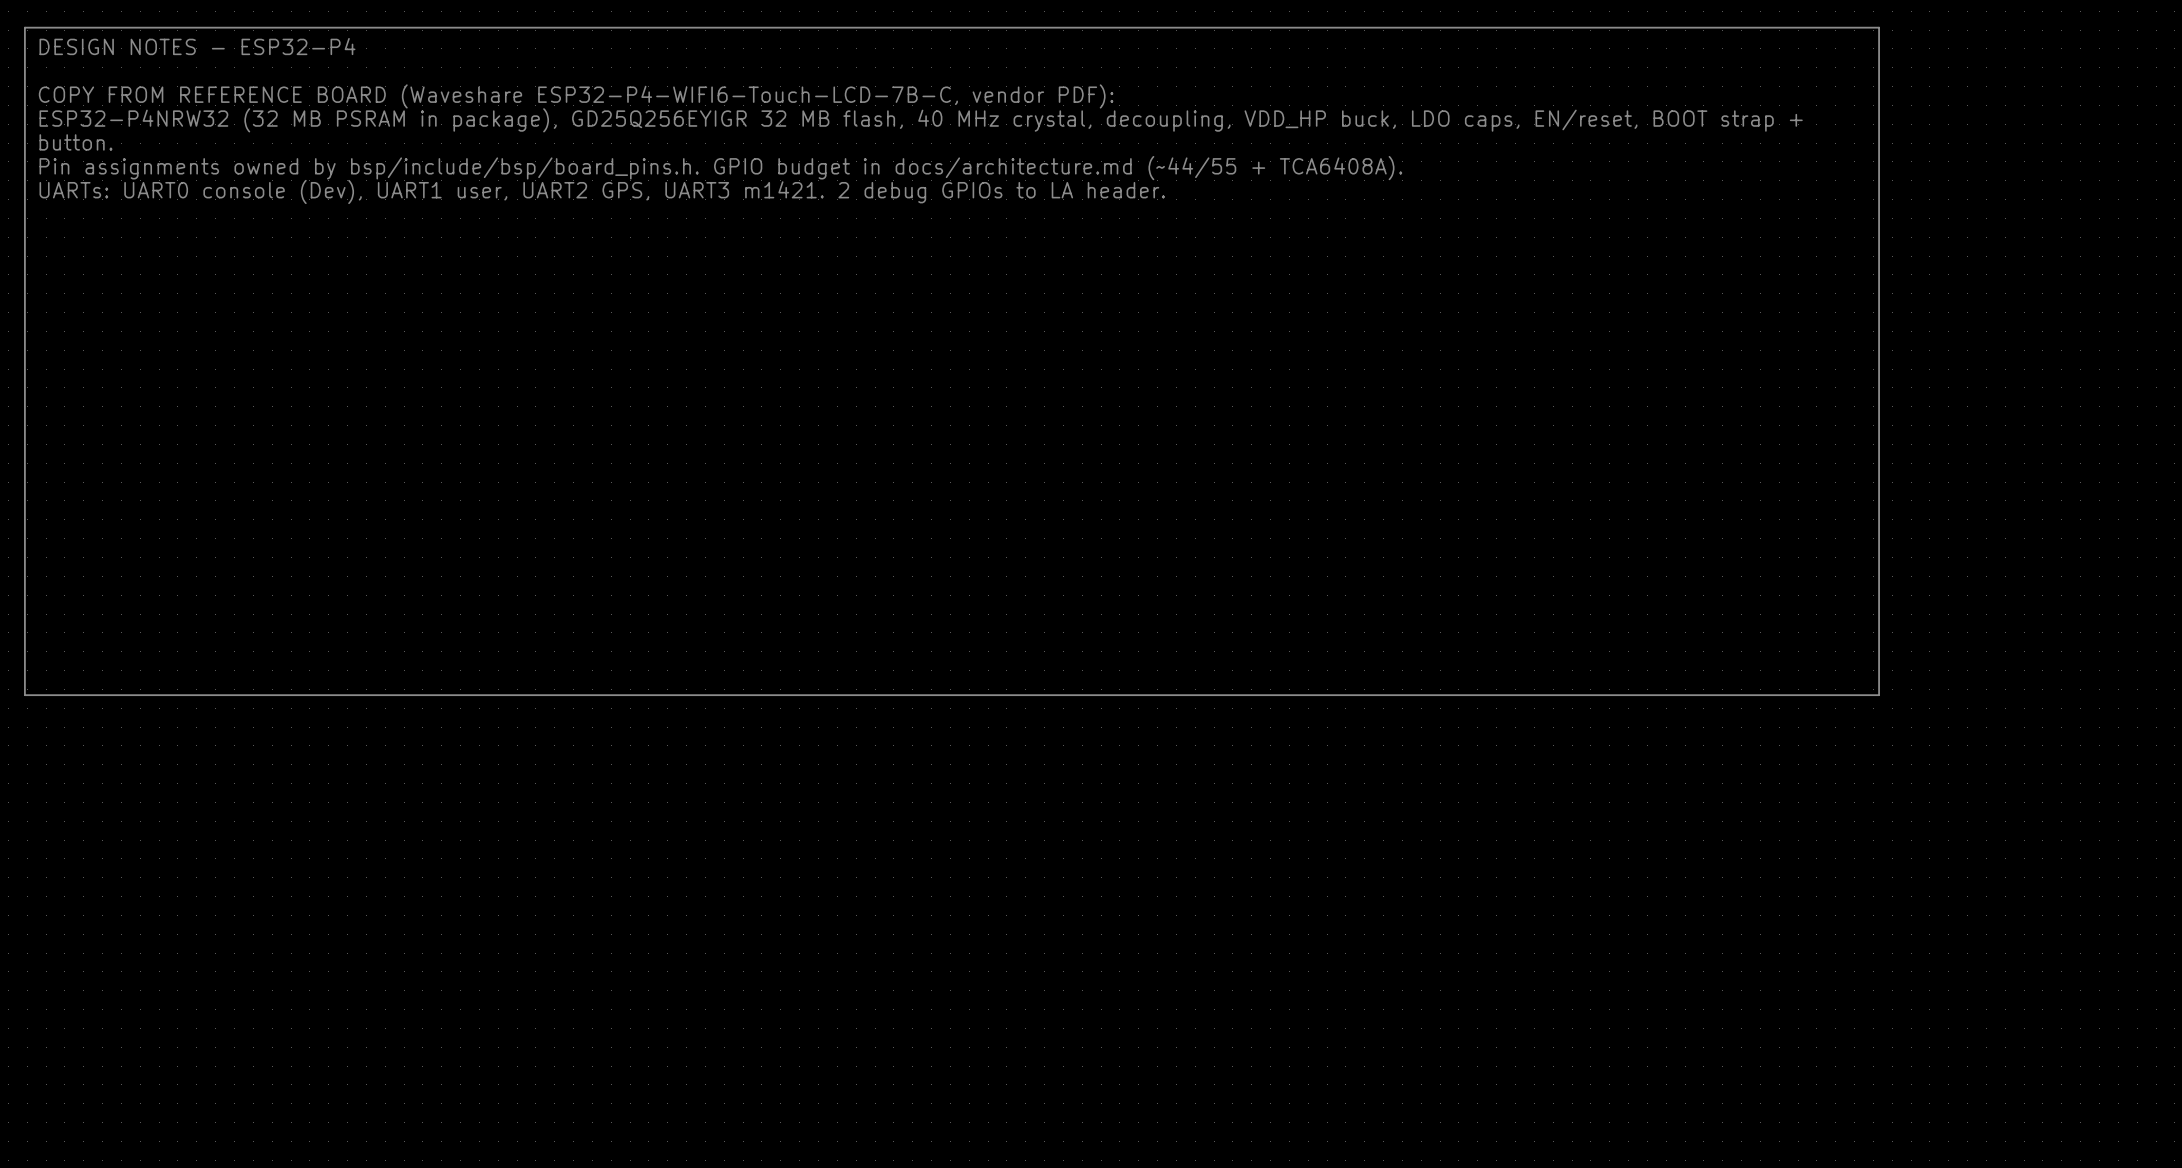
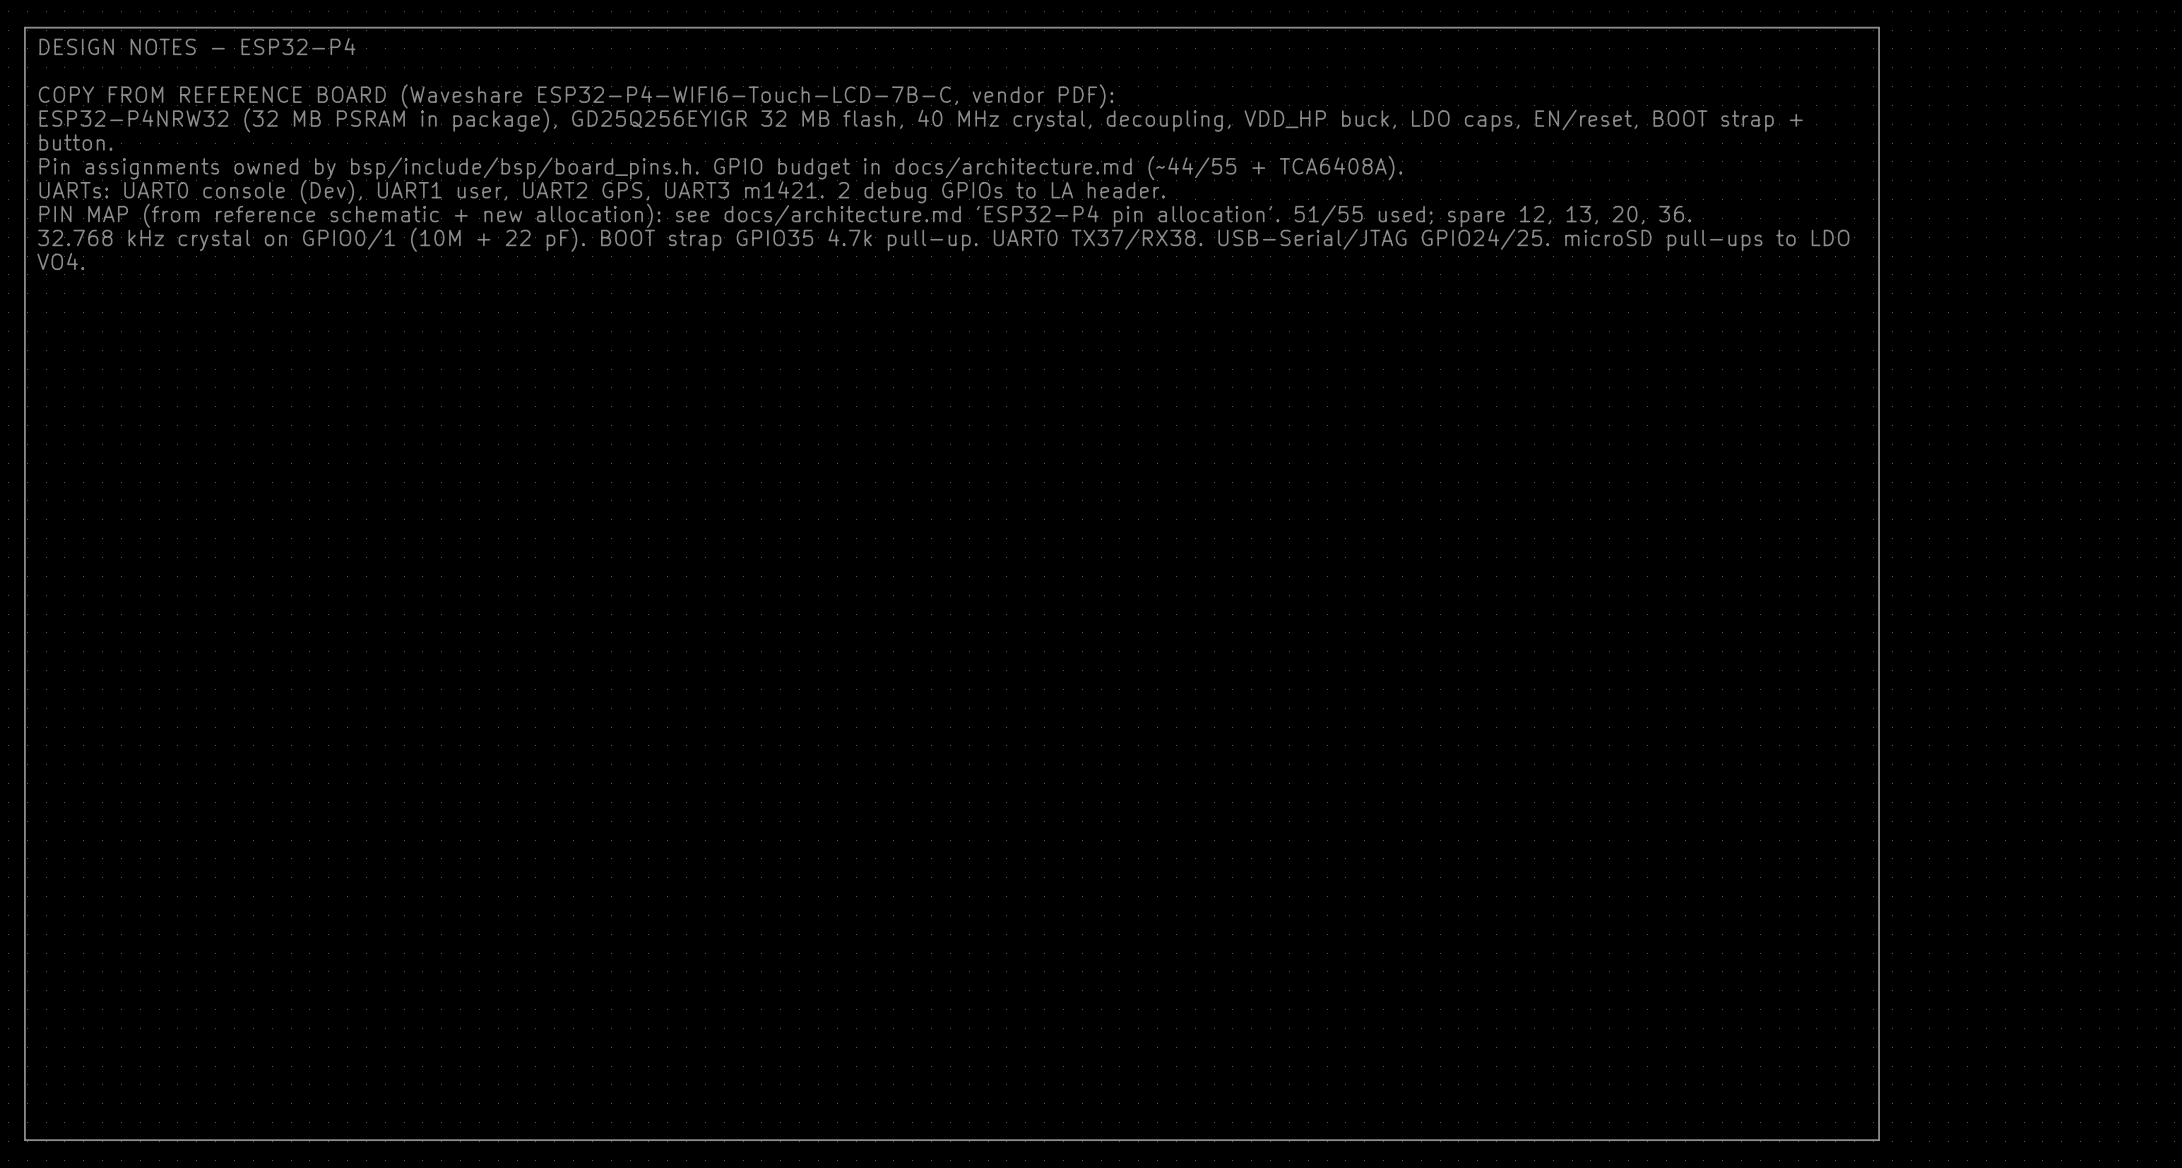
text: none -> PIN MAP (from reference schematic + new allocation): see docs/architecture.md 'ESP32-P4 pin allocation'. 51/55 used; spare 12, 13, 20, 36. (865, 215)
text: none -> 32.768 kHz crystal on GPIO0/1 (10M + 22 pF). BOOT strap GPIO35 4.7k pull-up. UART0 TX37/RX38. USB-Serial/JTAG GPIO24/25. microSD pull-ups to LDO (943, 239)
text: none -> VO4. (60, 261)
line: (24, 695) (1879, 695) -> (24, 695) (24, 1140) (1879, 1140) (1879, 695)

